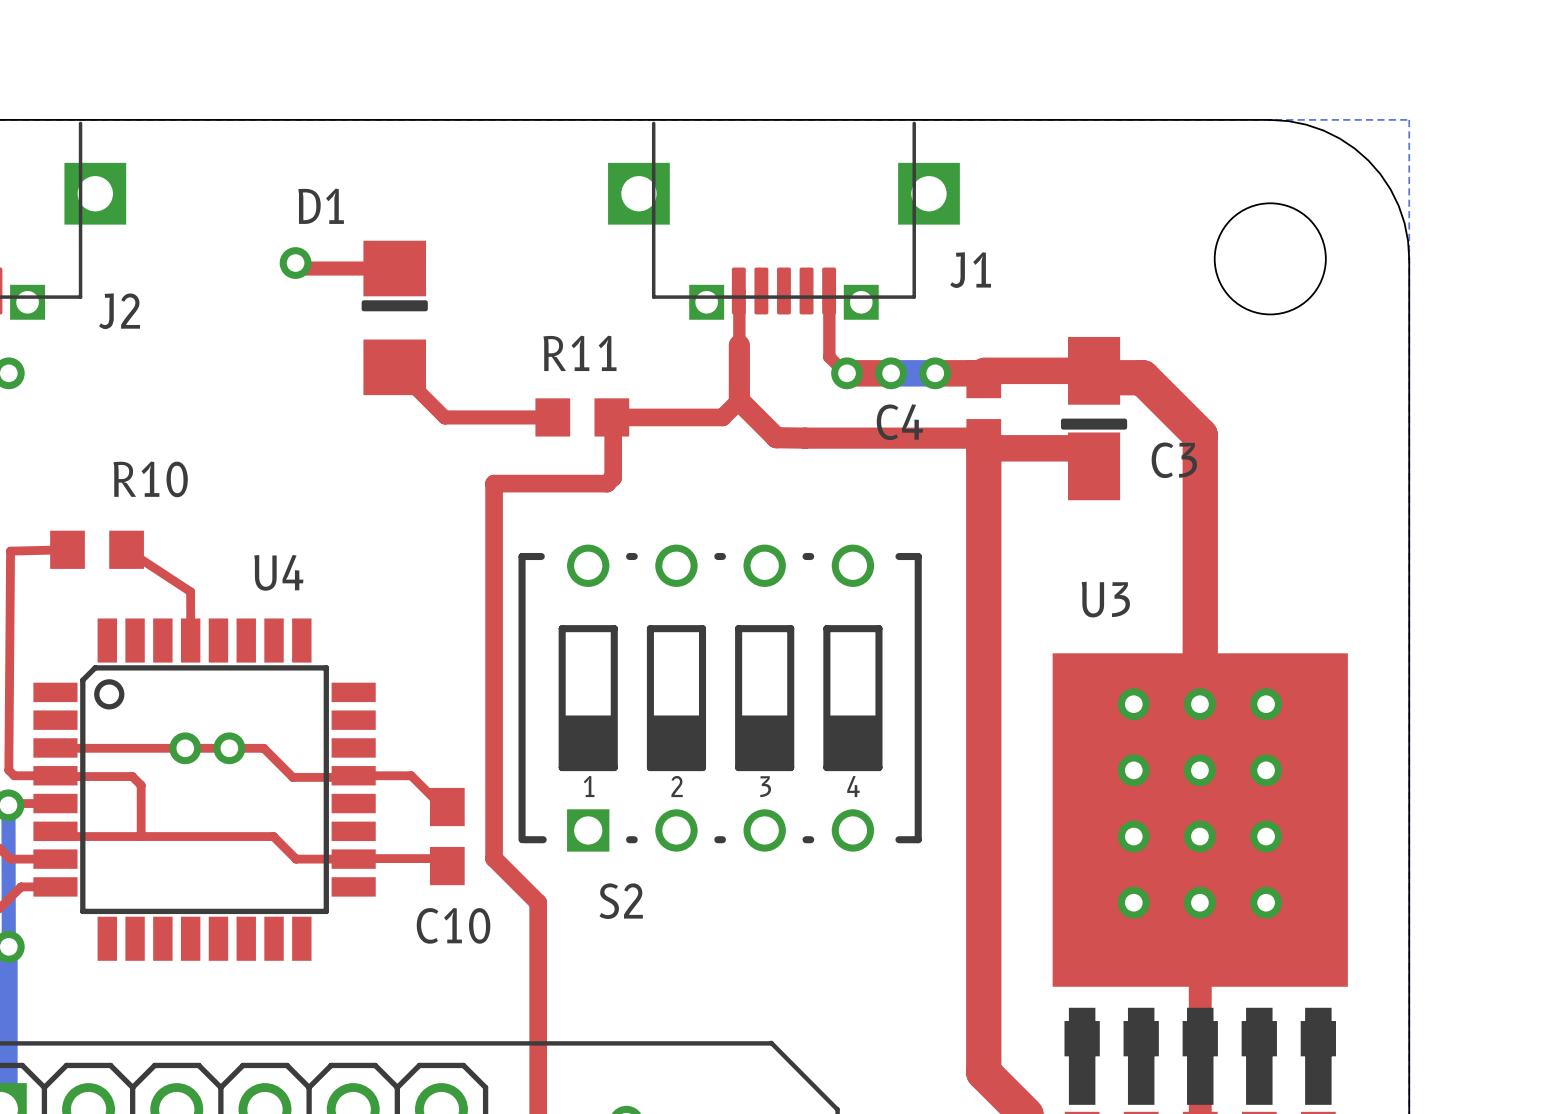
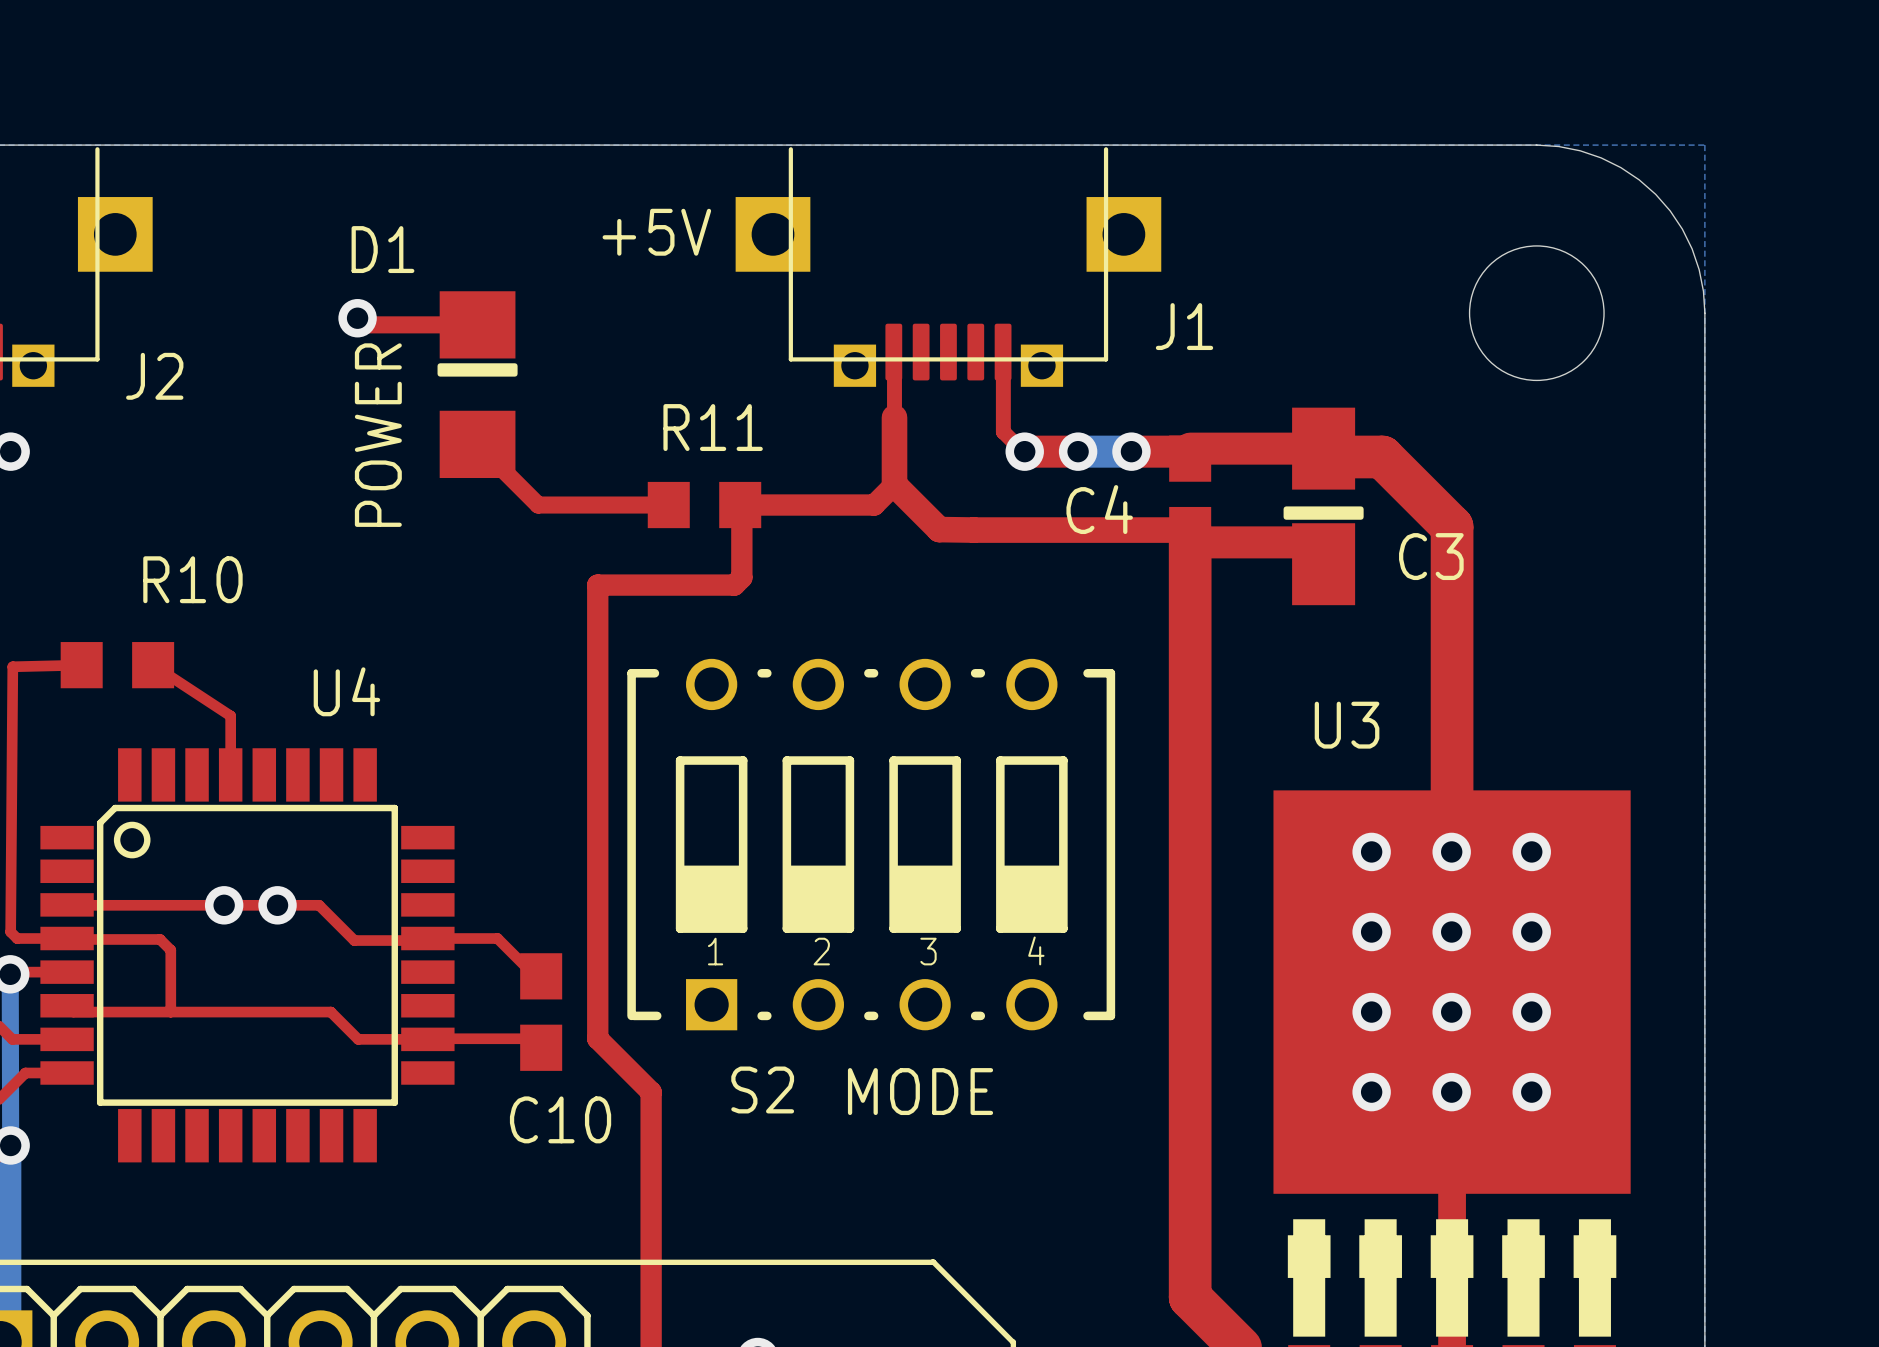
text: none -> +5V (656, 232)
text: none -> POWER (378, 435)
text: none -> MODE (920, 1091)

